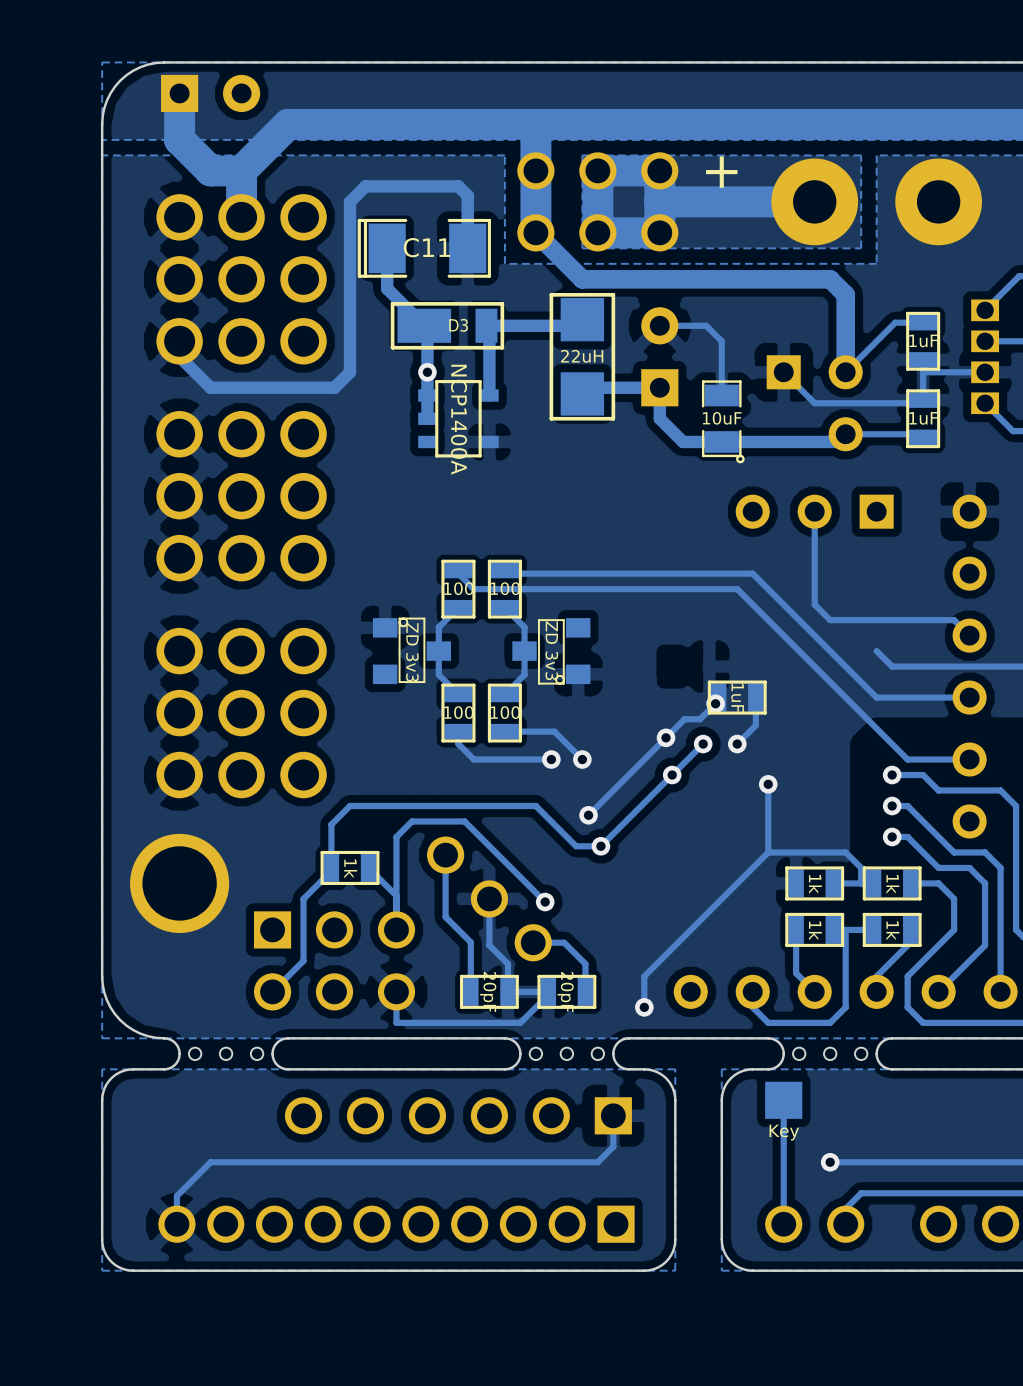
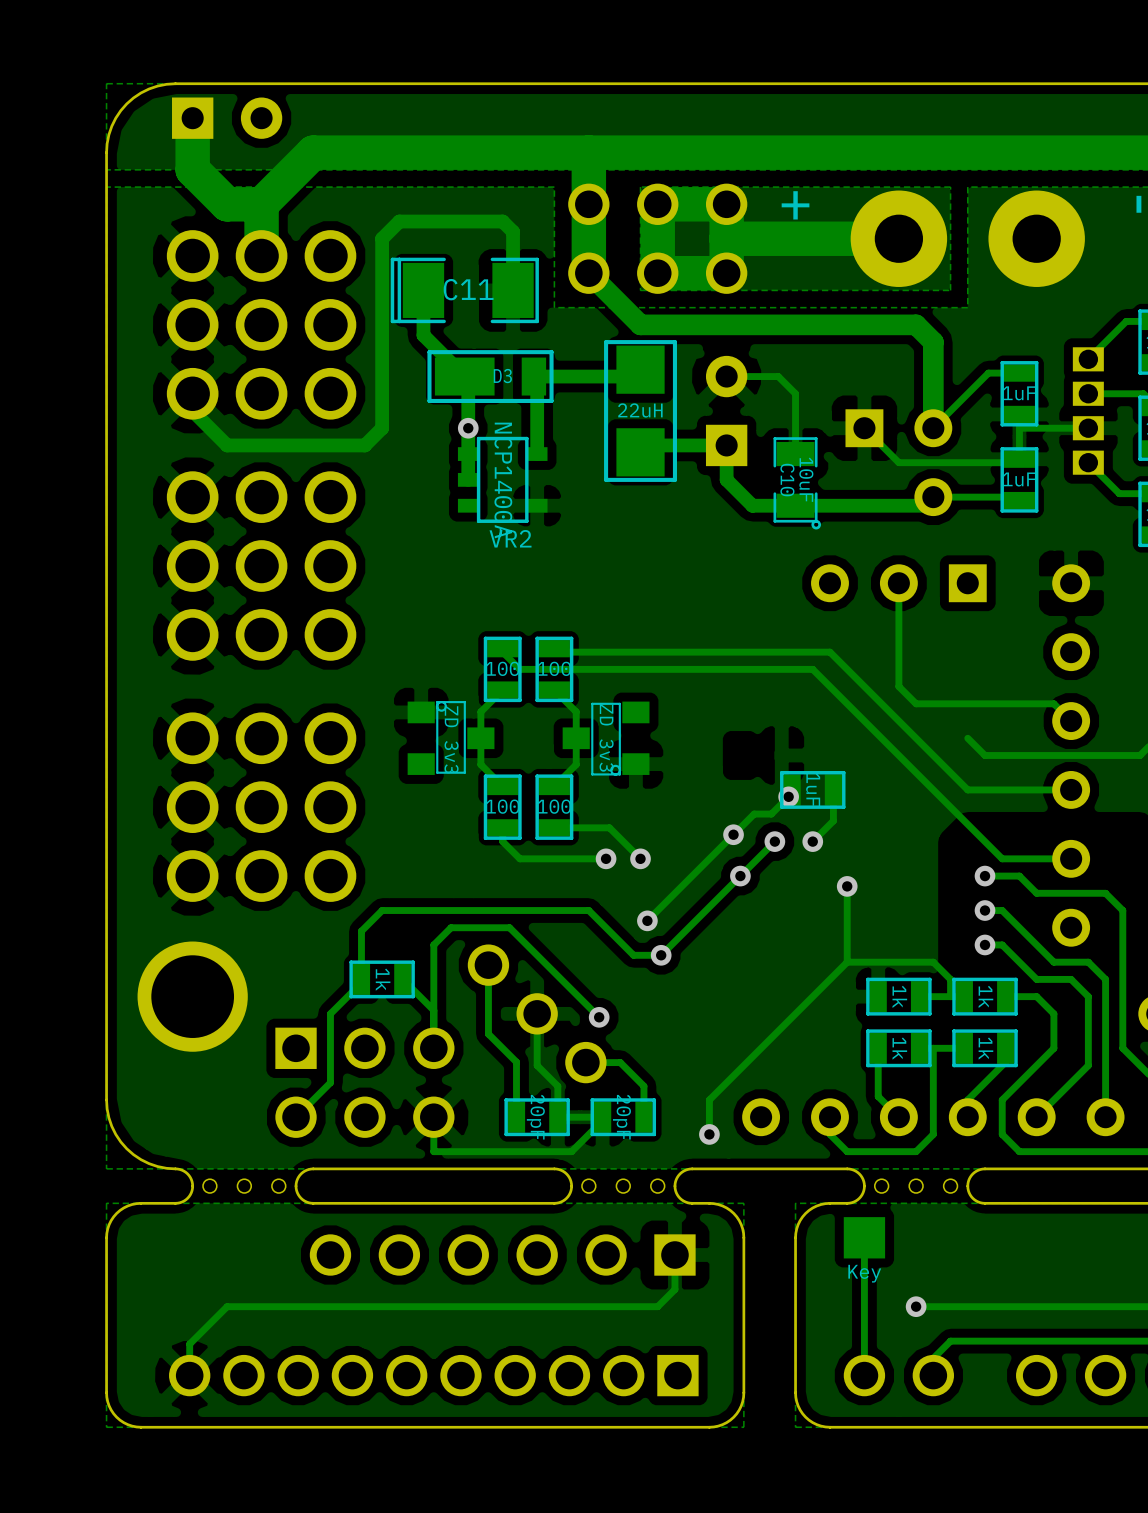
C10 name: none -> C10 (787, 480)
C10 value rotation: 0° (722, 418) -> 90° clockwise (806, 479)
VR2 name: none -> VR2 (510, 538)

